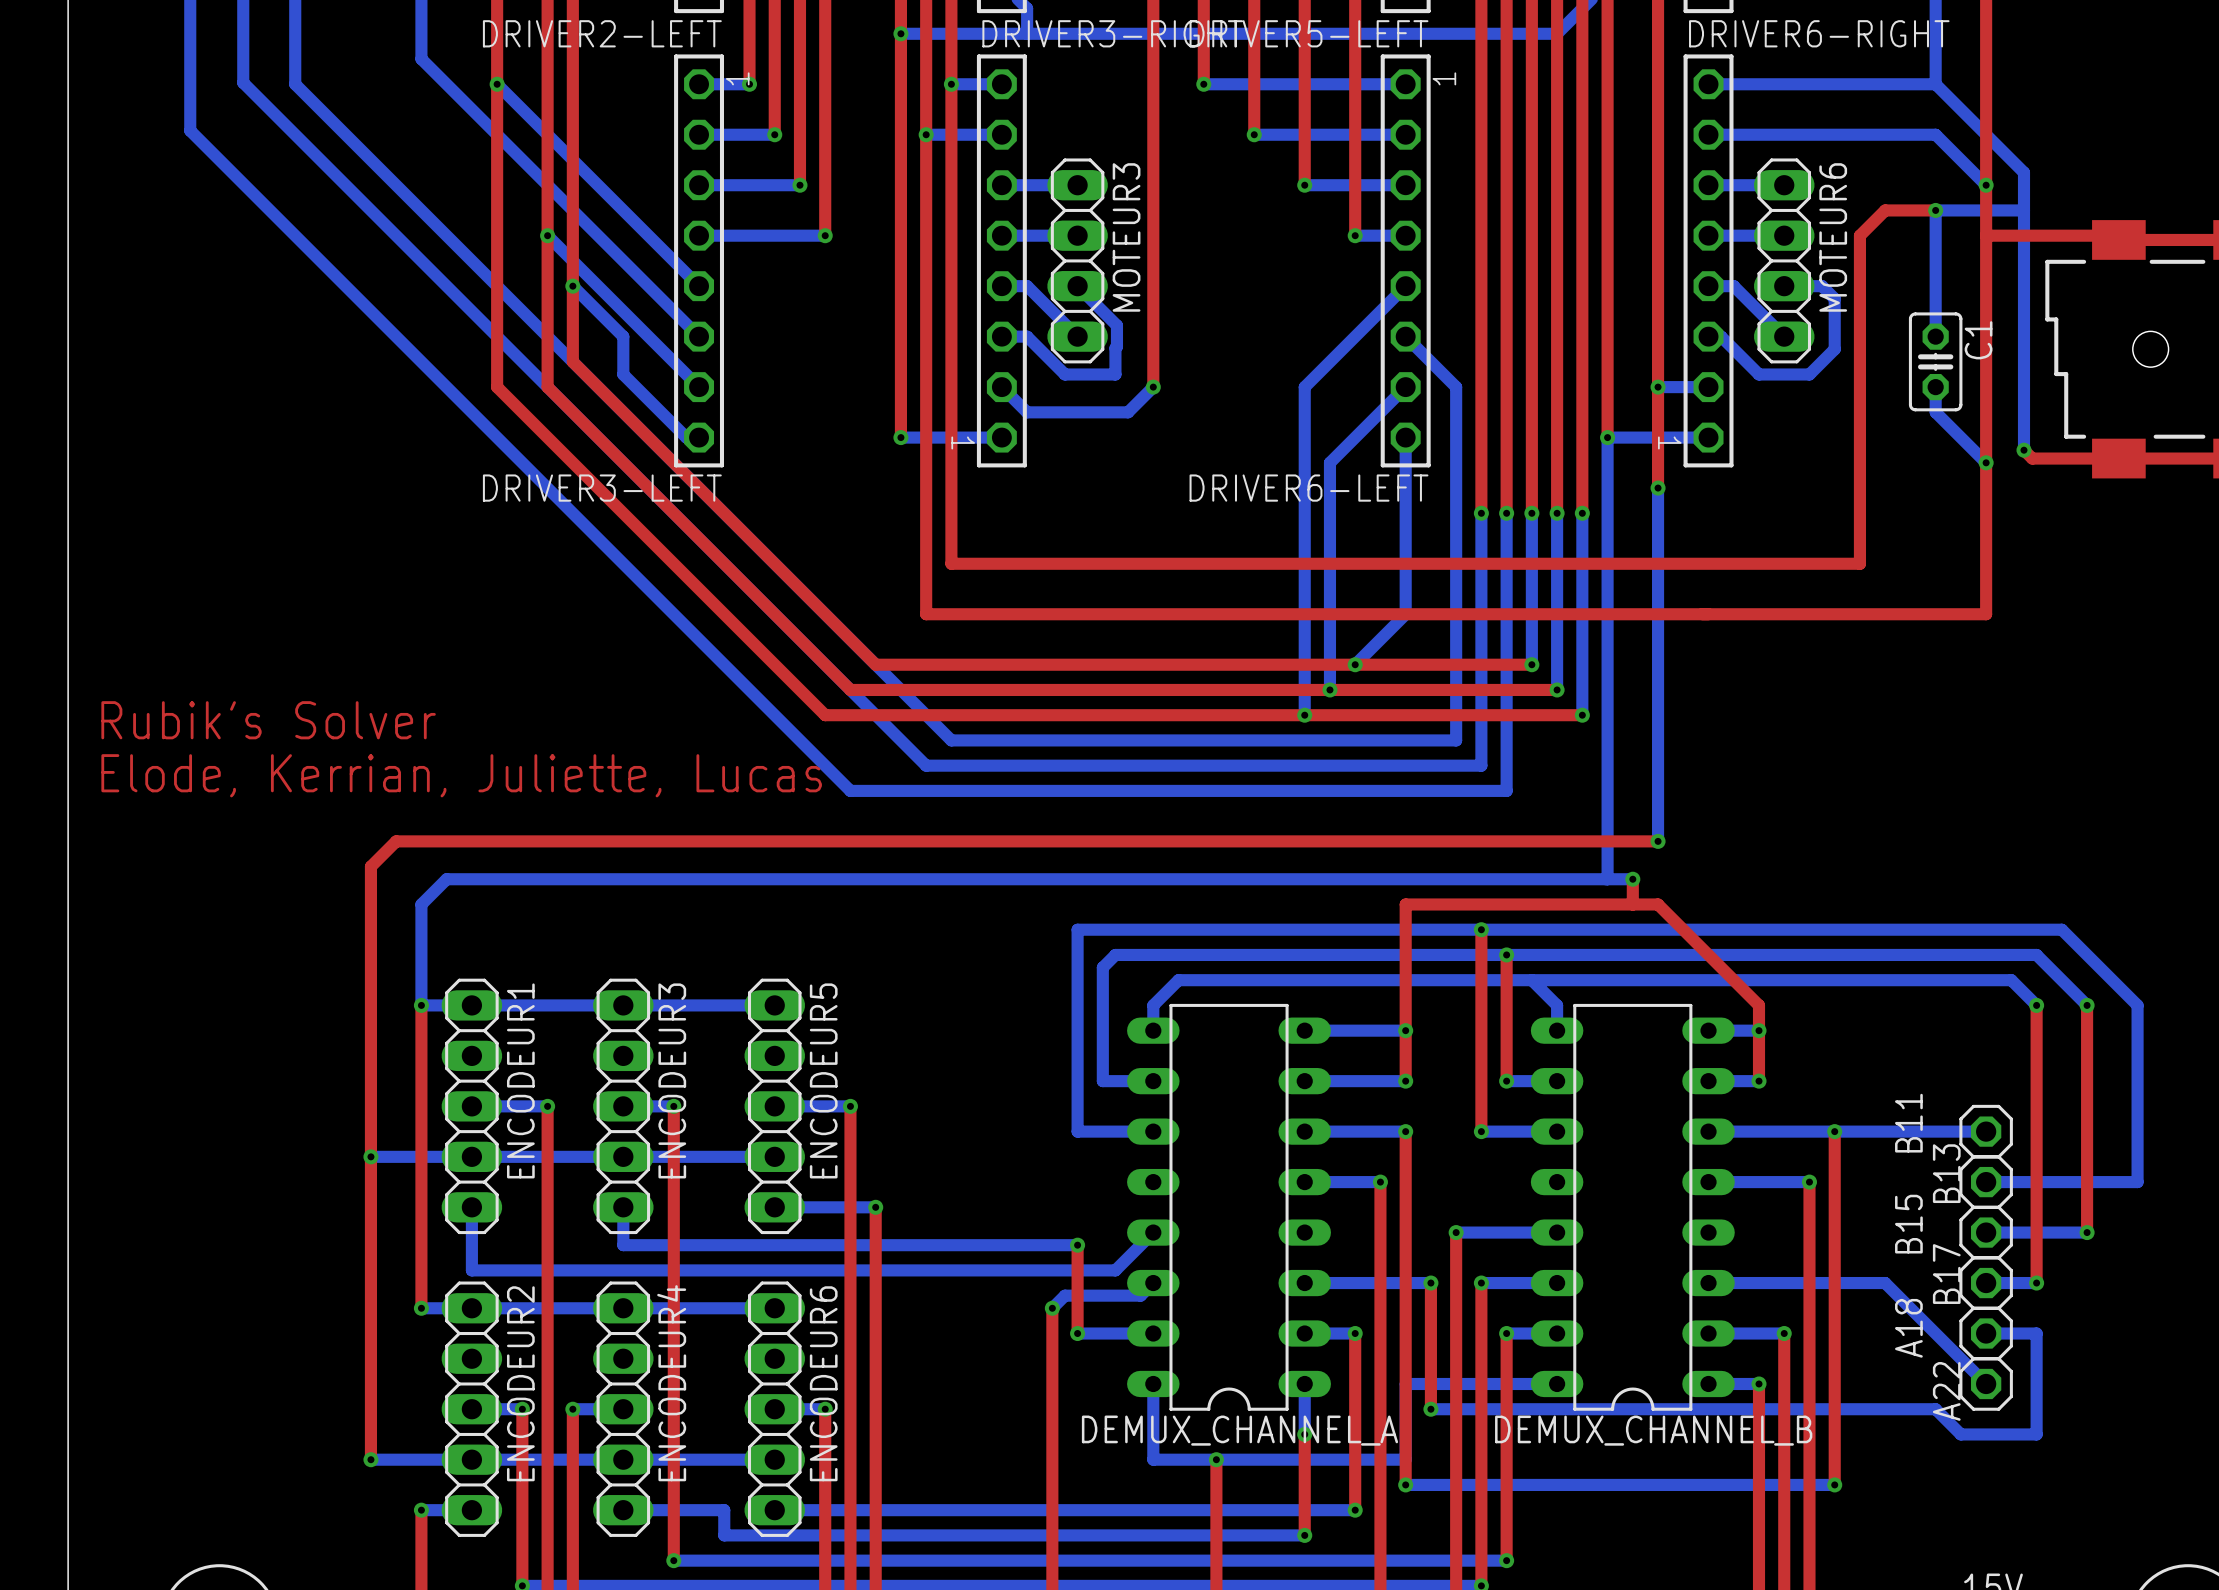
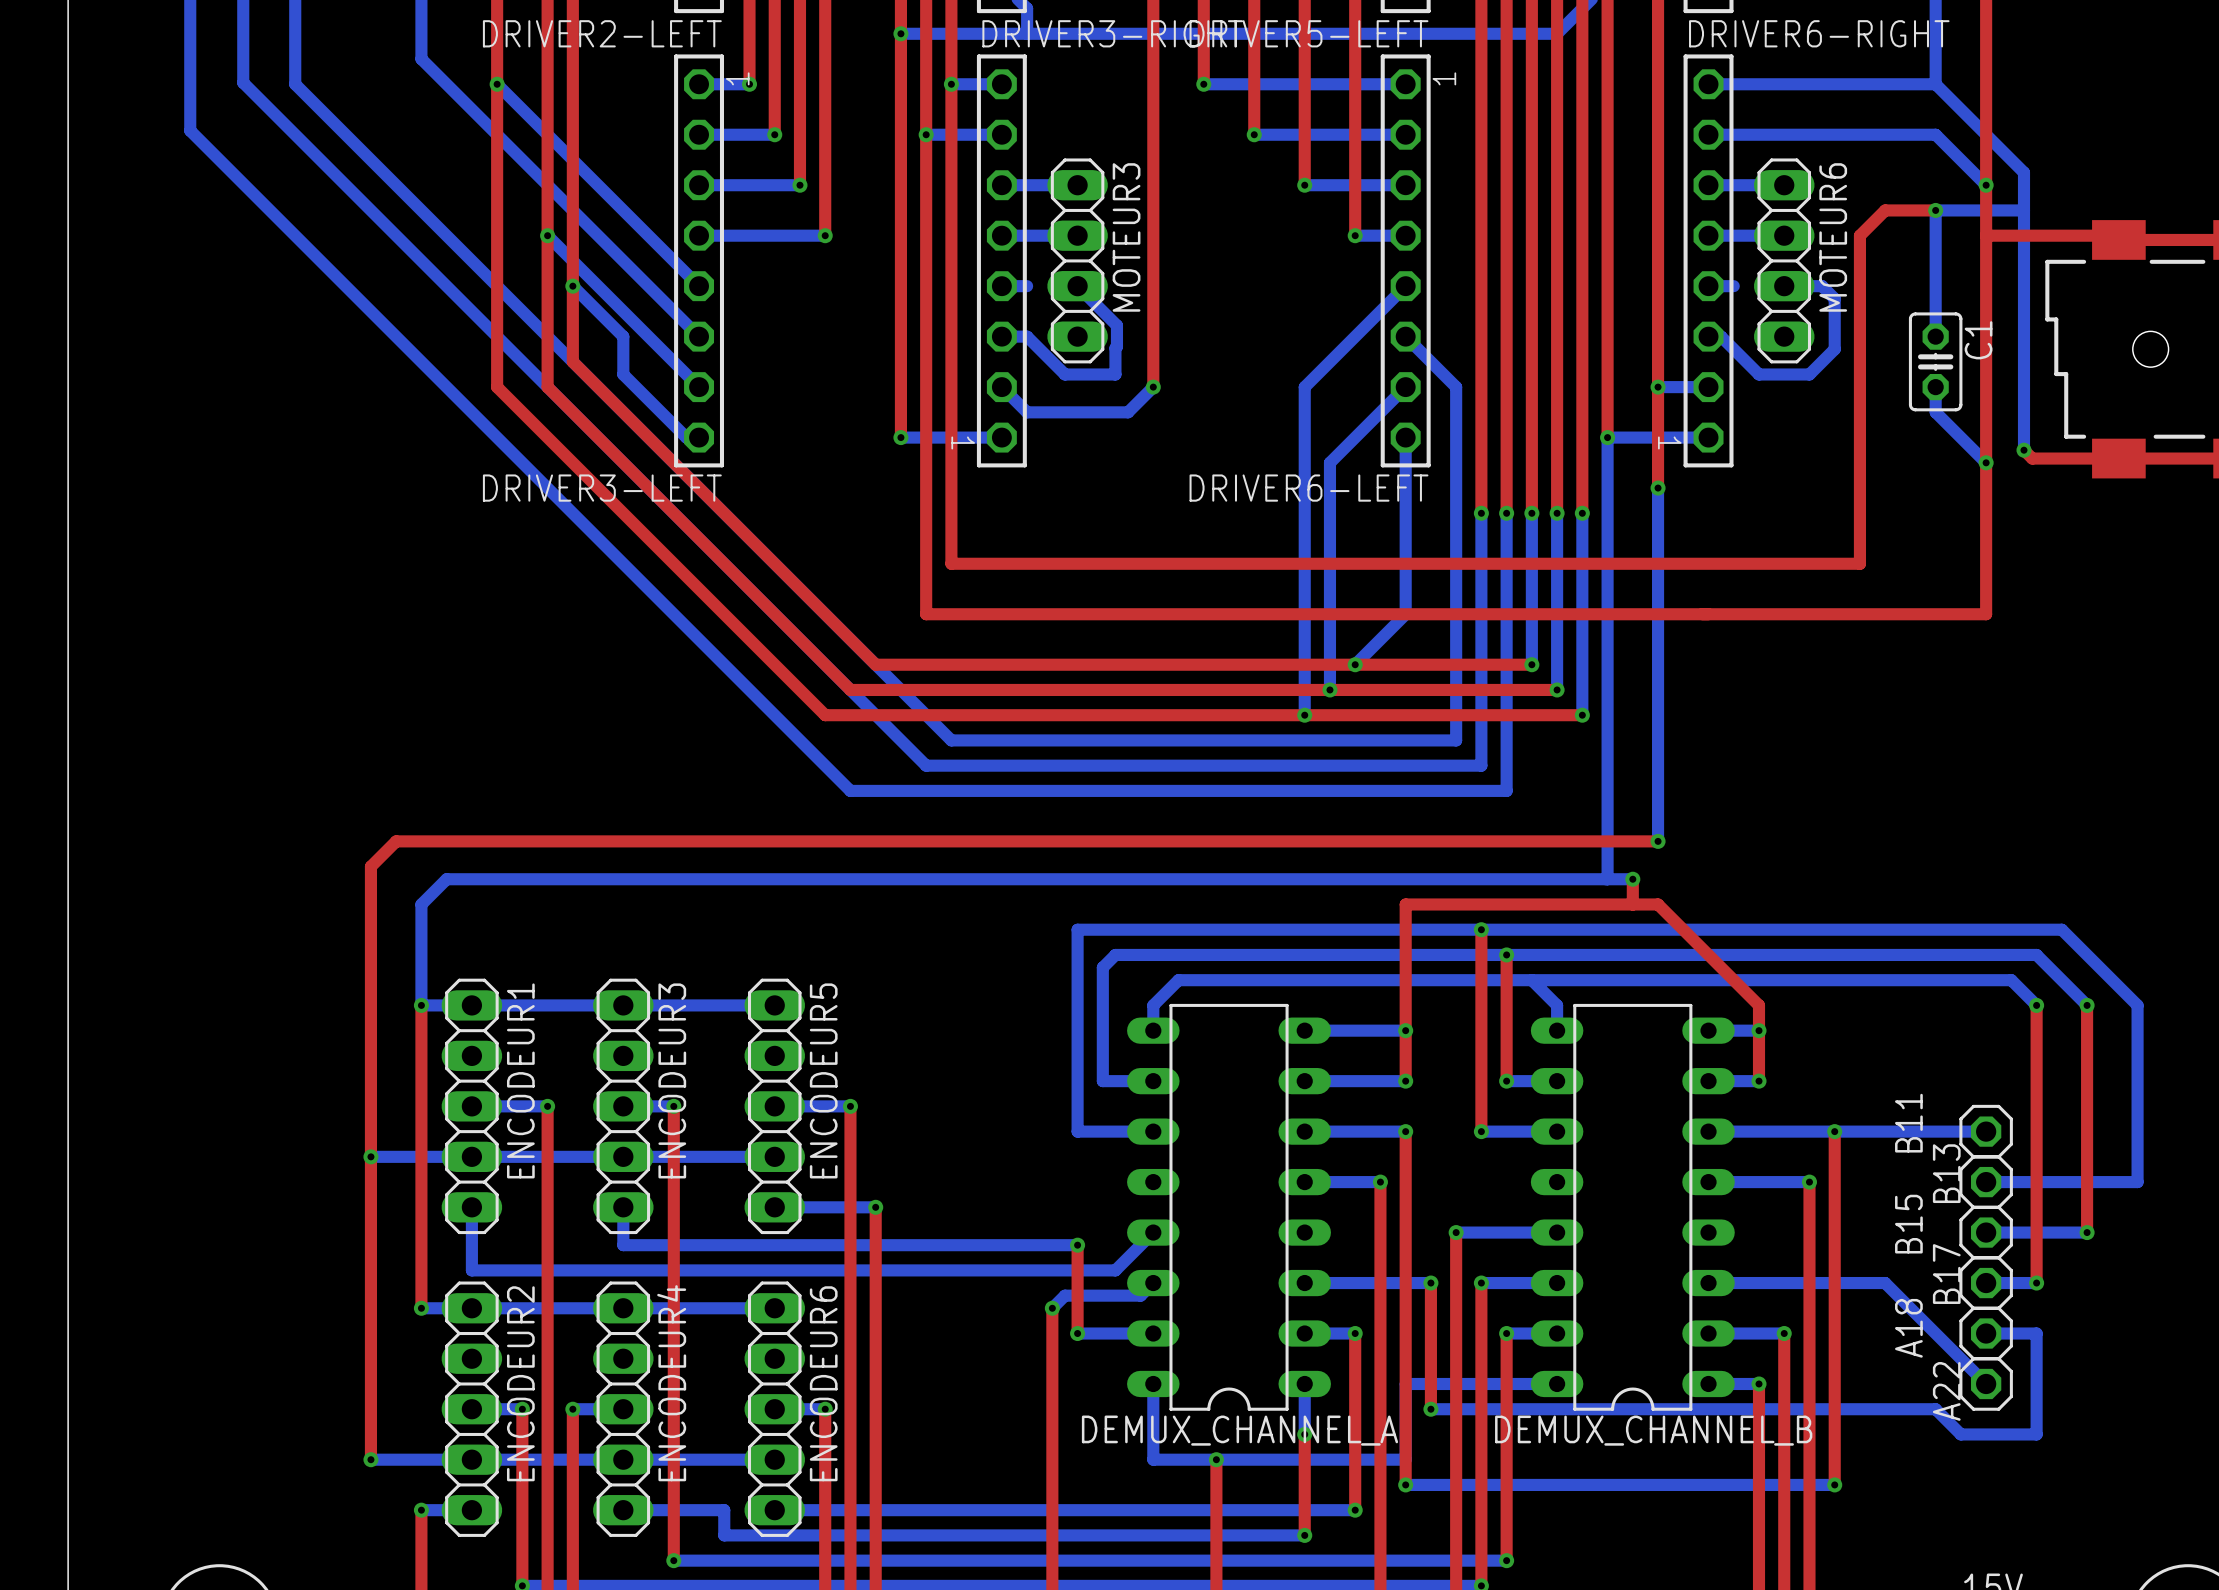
bottom track: (1027, 286) (1077, 336) -> none
bottom track: (1733, 286) (1784, 336) -> none
text: Rubik's Solver (268, 720) -> none
text: Elode, Kerrian, Juliette, Lucas (461, 775) -> none

